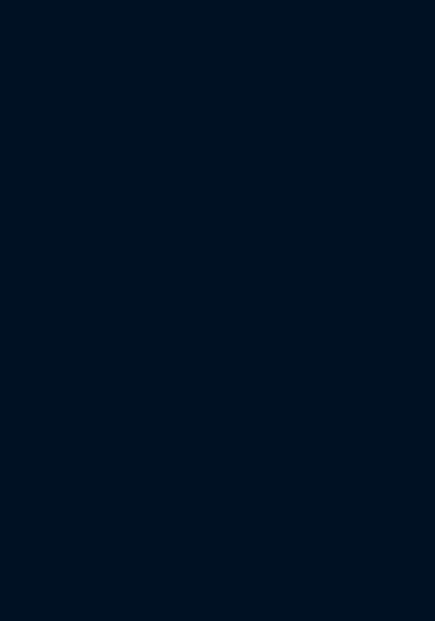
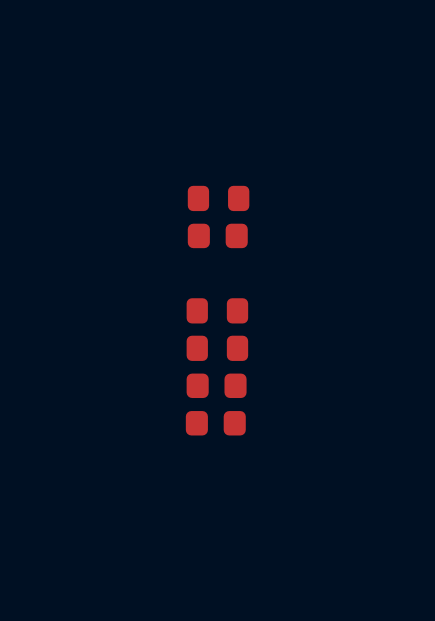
part: none -> (218, 198)
part: none -> (217, 235)
part: none -> (217, 310)
part: none -> (217, 348)
part: none -> (216, 385)
part: none -> (215, 423)

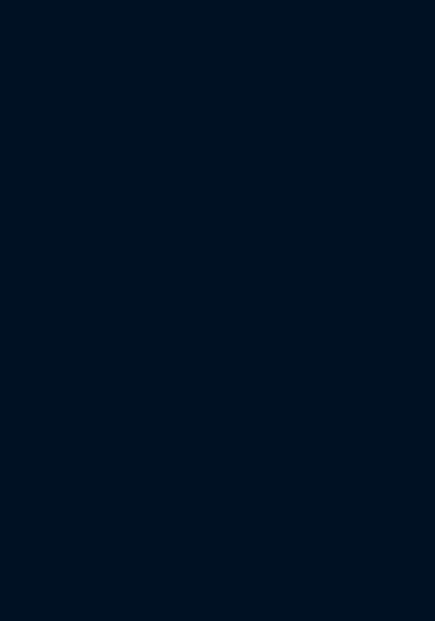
part: (218, 198) -> none
part: (217, 235) -> none
part: (217, 310) -> none
part: (217, 348) -> none
part: (216, 385) -> none
part: (215, 423) -> none

